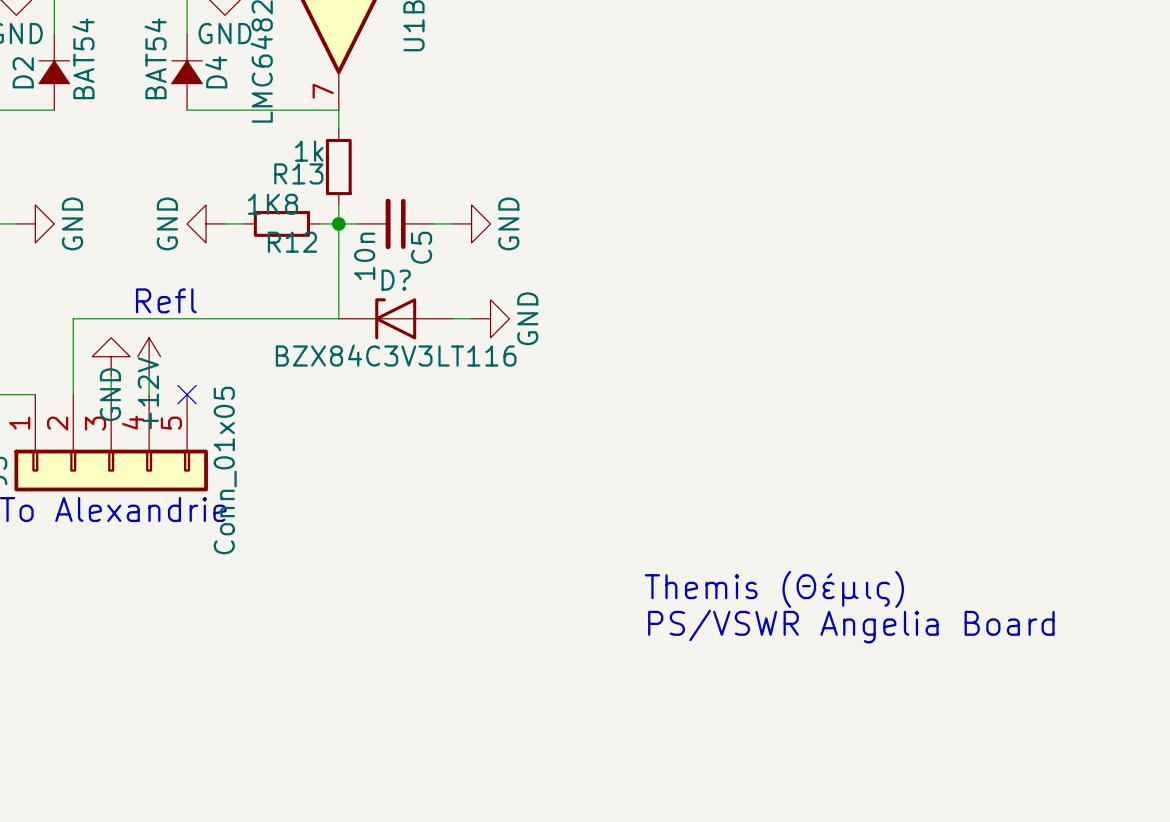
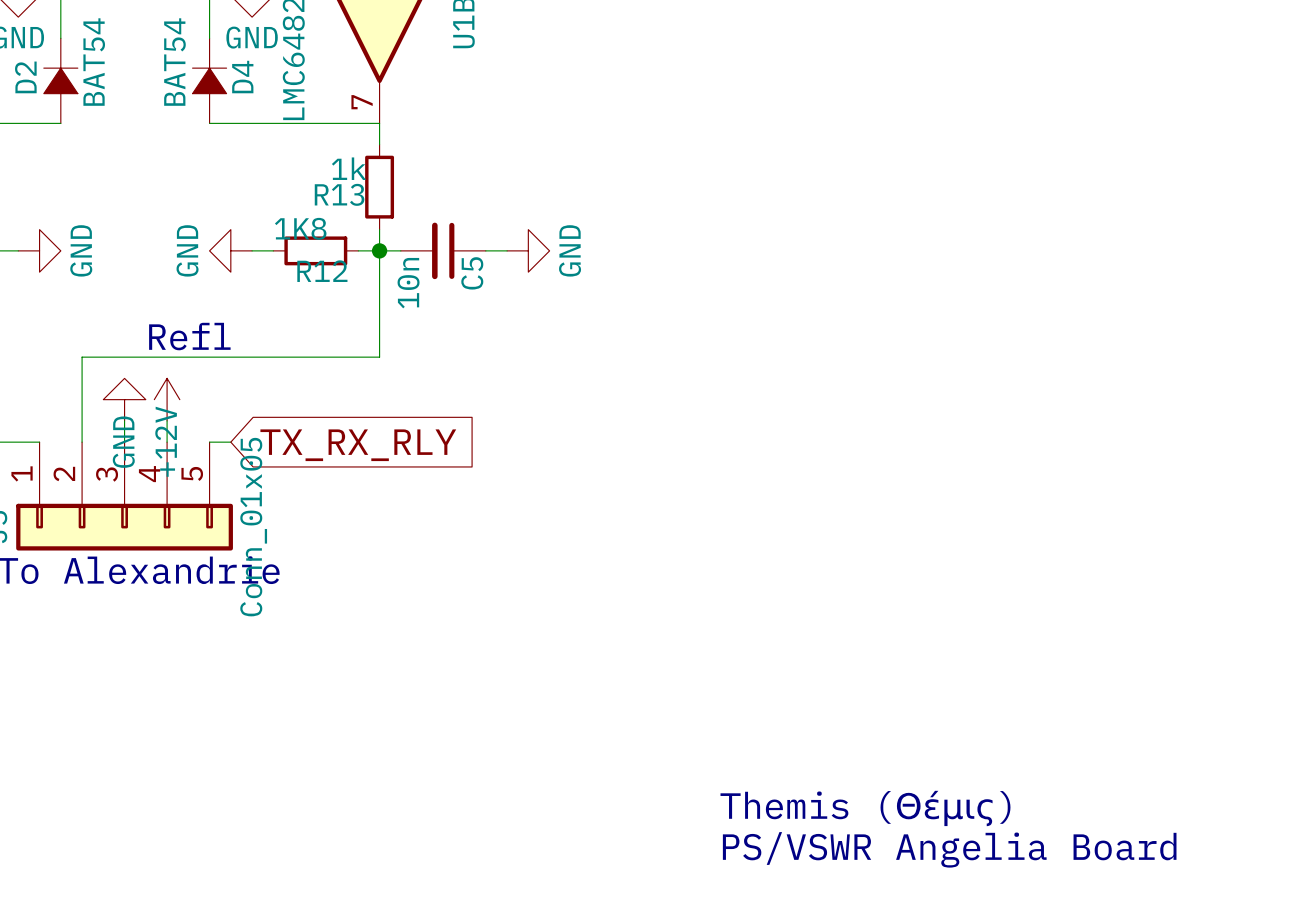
D?: BZX84C3V3LT116 (395, 318) -> none
wire: (452, 318) (471, 318) -> (209, 442) (230, 442)
power symbol: GND (490, 318) -> none
no-connect mark: (187, 394) -> none
global label: none -> TX_RX_RLY (358, 445)
text position: Themis (Θέμις) (774, 589) -> Themis (Θέμις) (865, 808)
text position: PS/VSWR Angelia Board (851, 626) -> PS/VSWR Angelia Board (949, 849)

